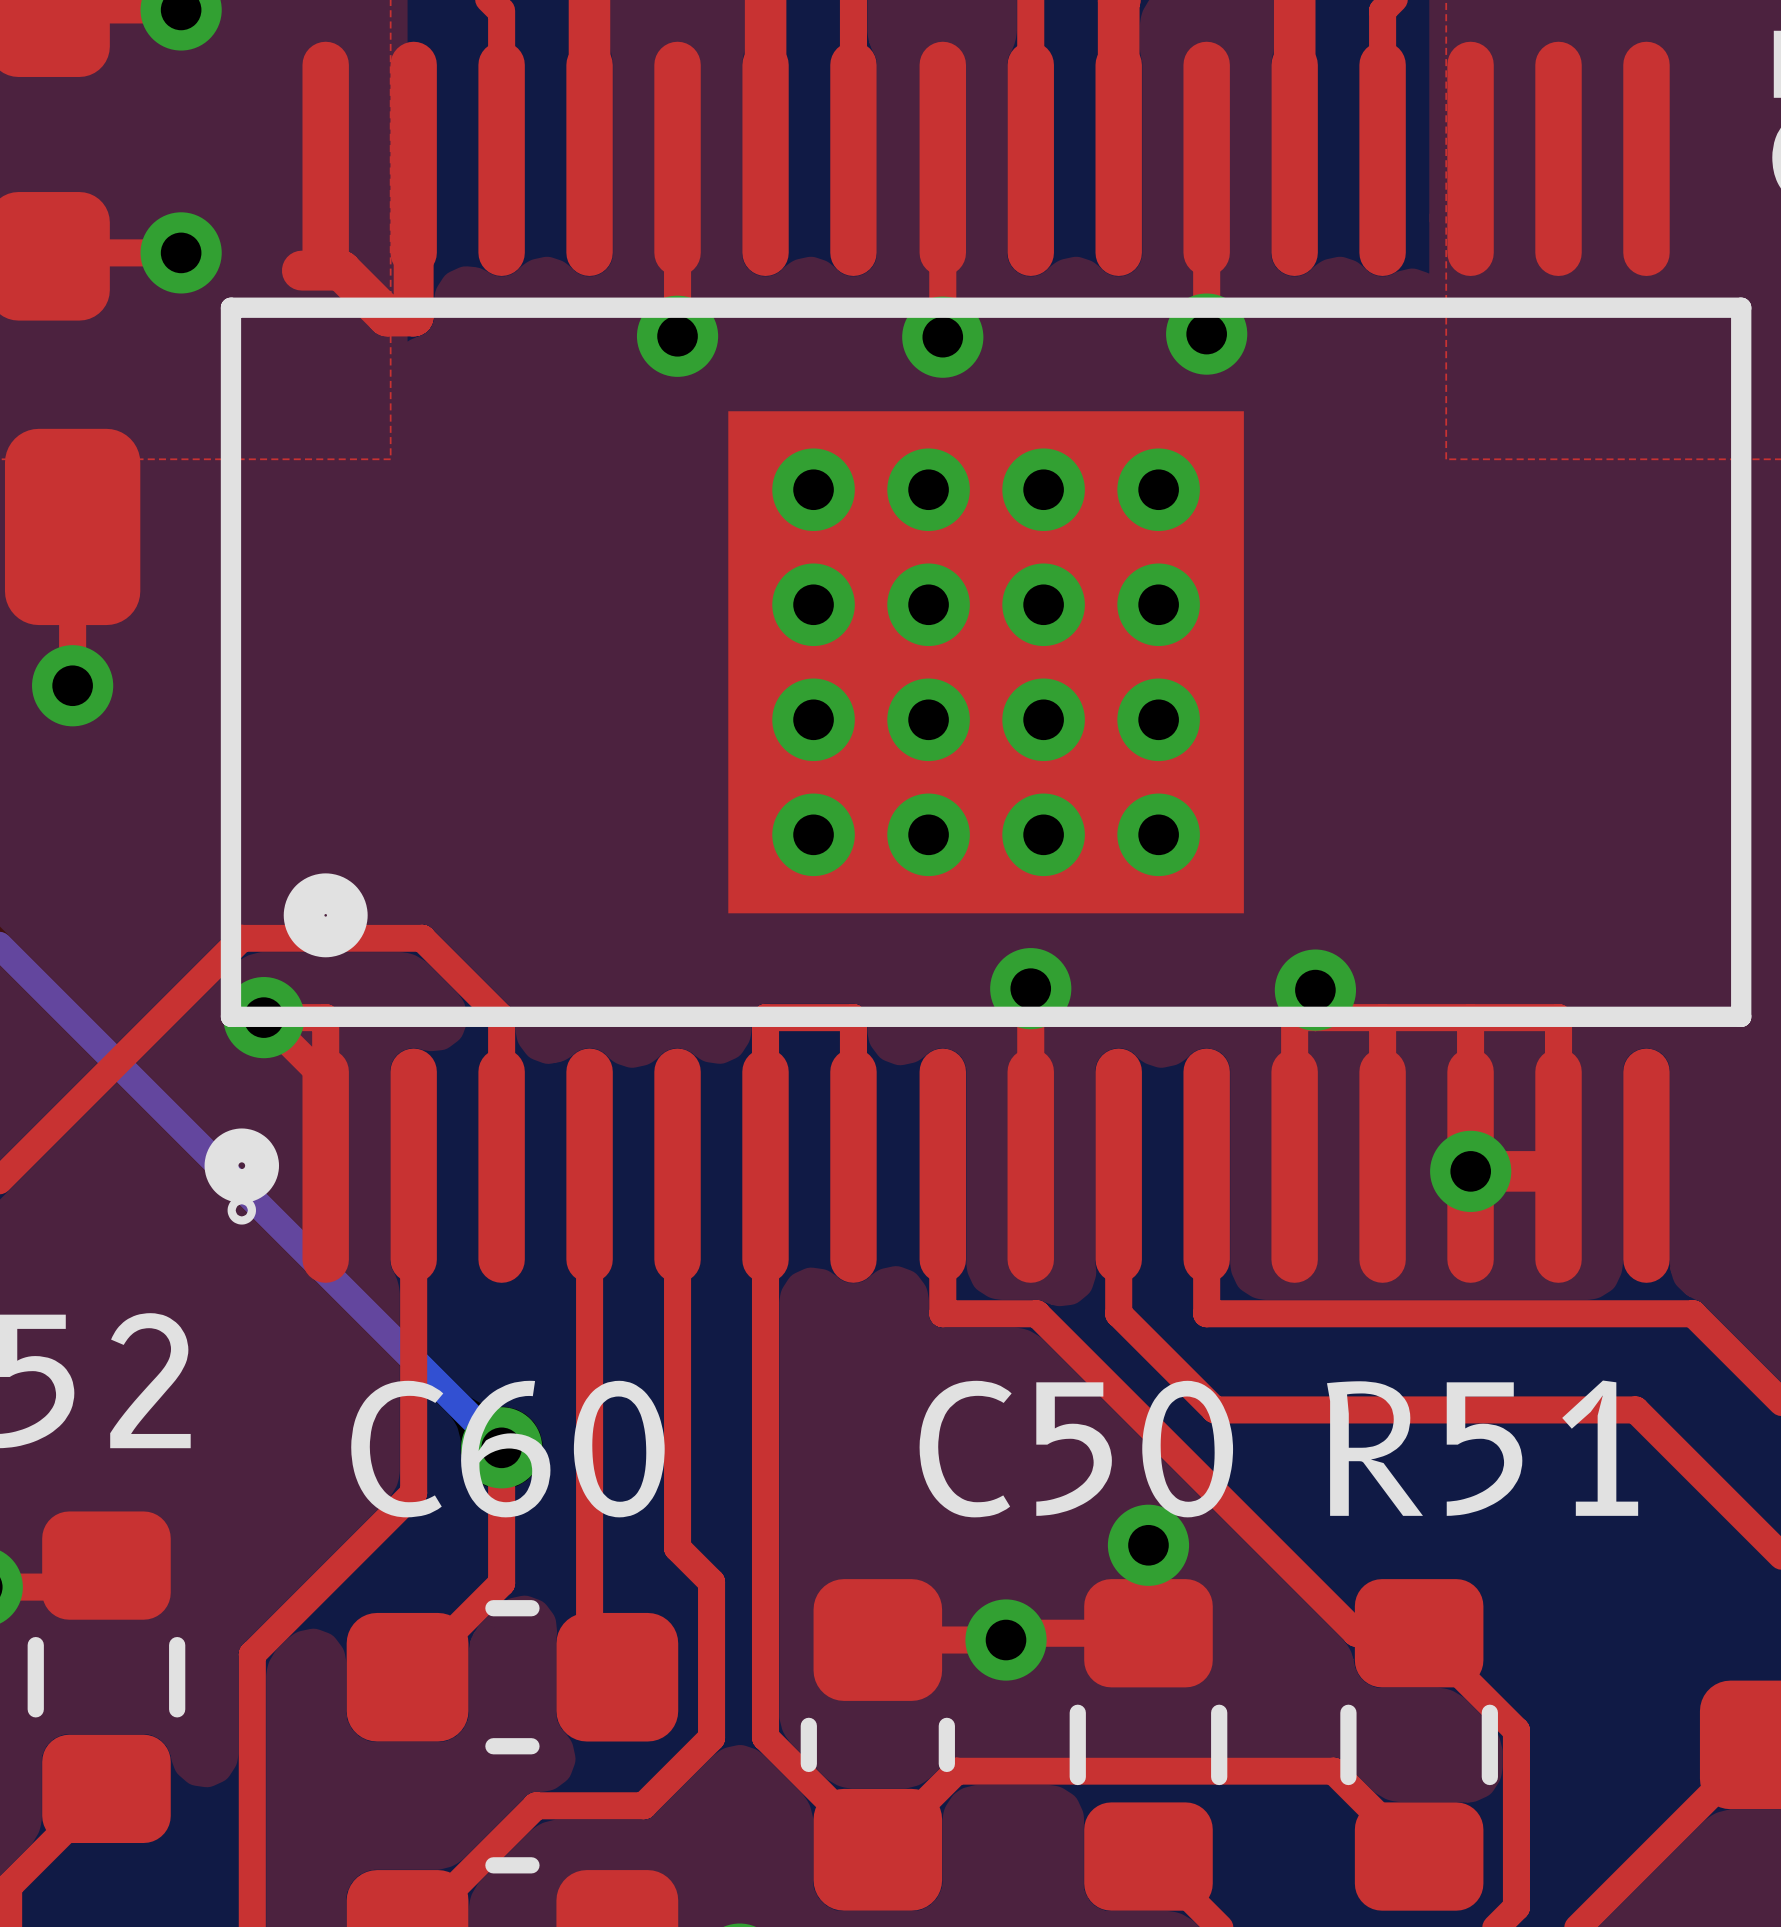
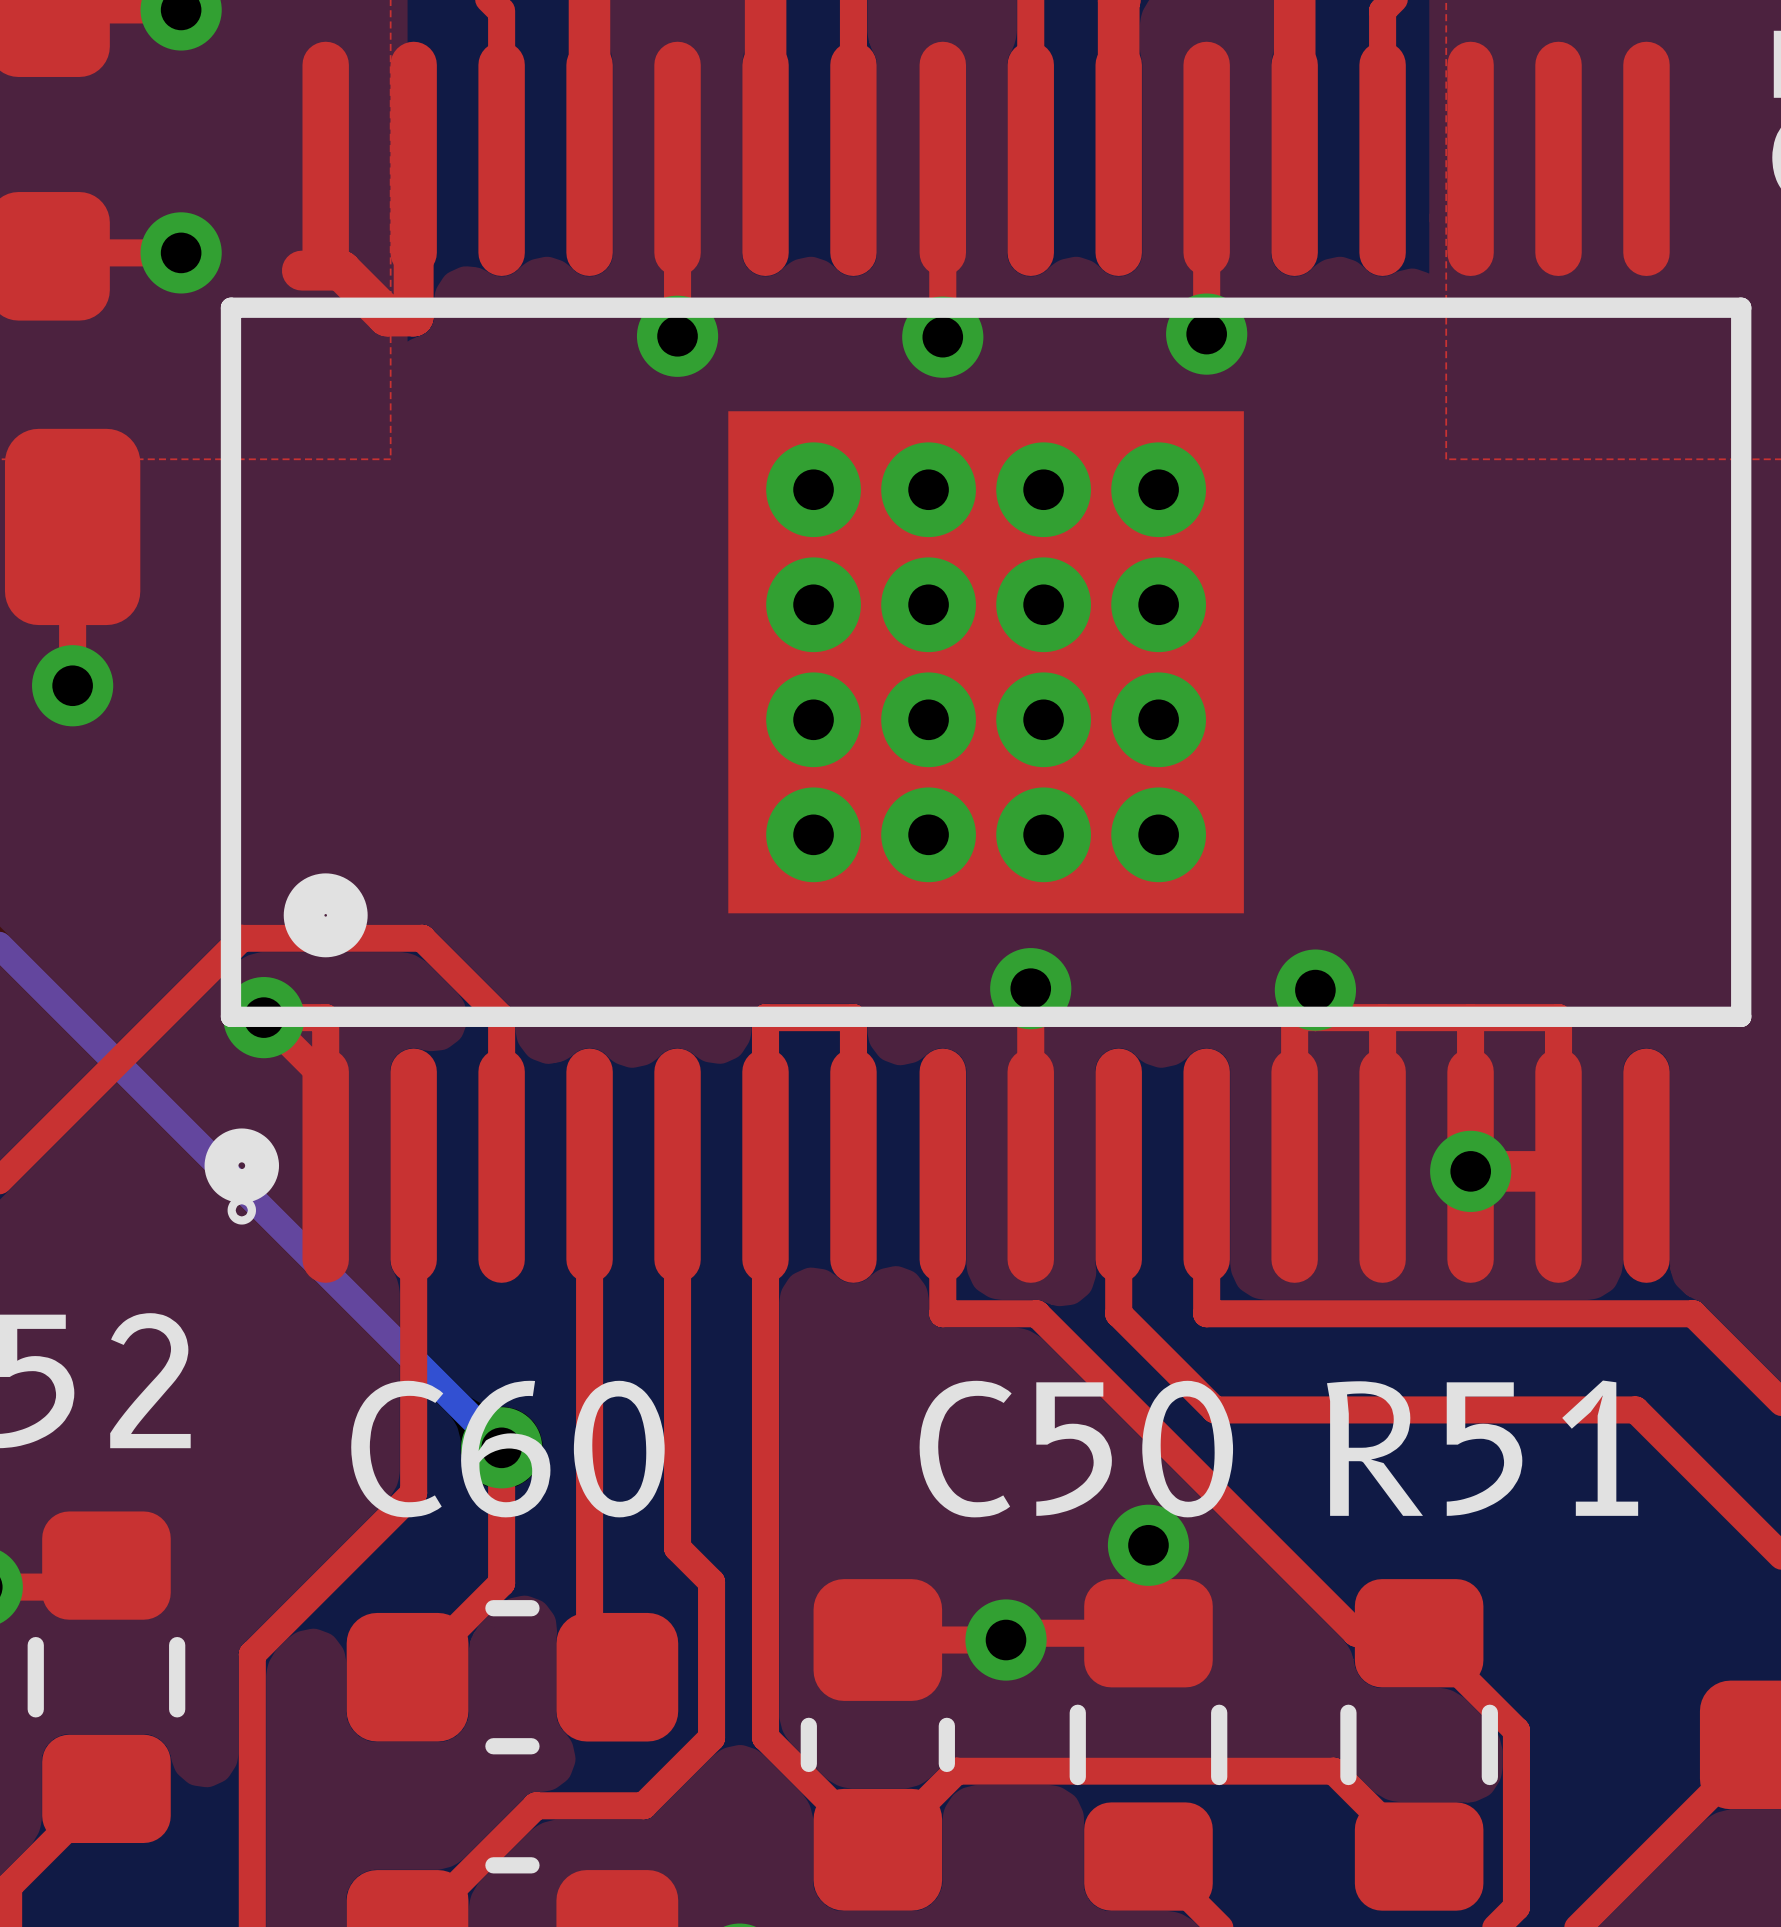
part footprint: [204, 41, 1752, 1283] -> [204, 41, 1752, 1283]

